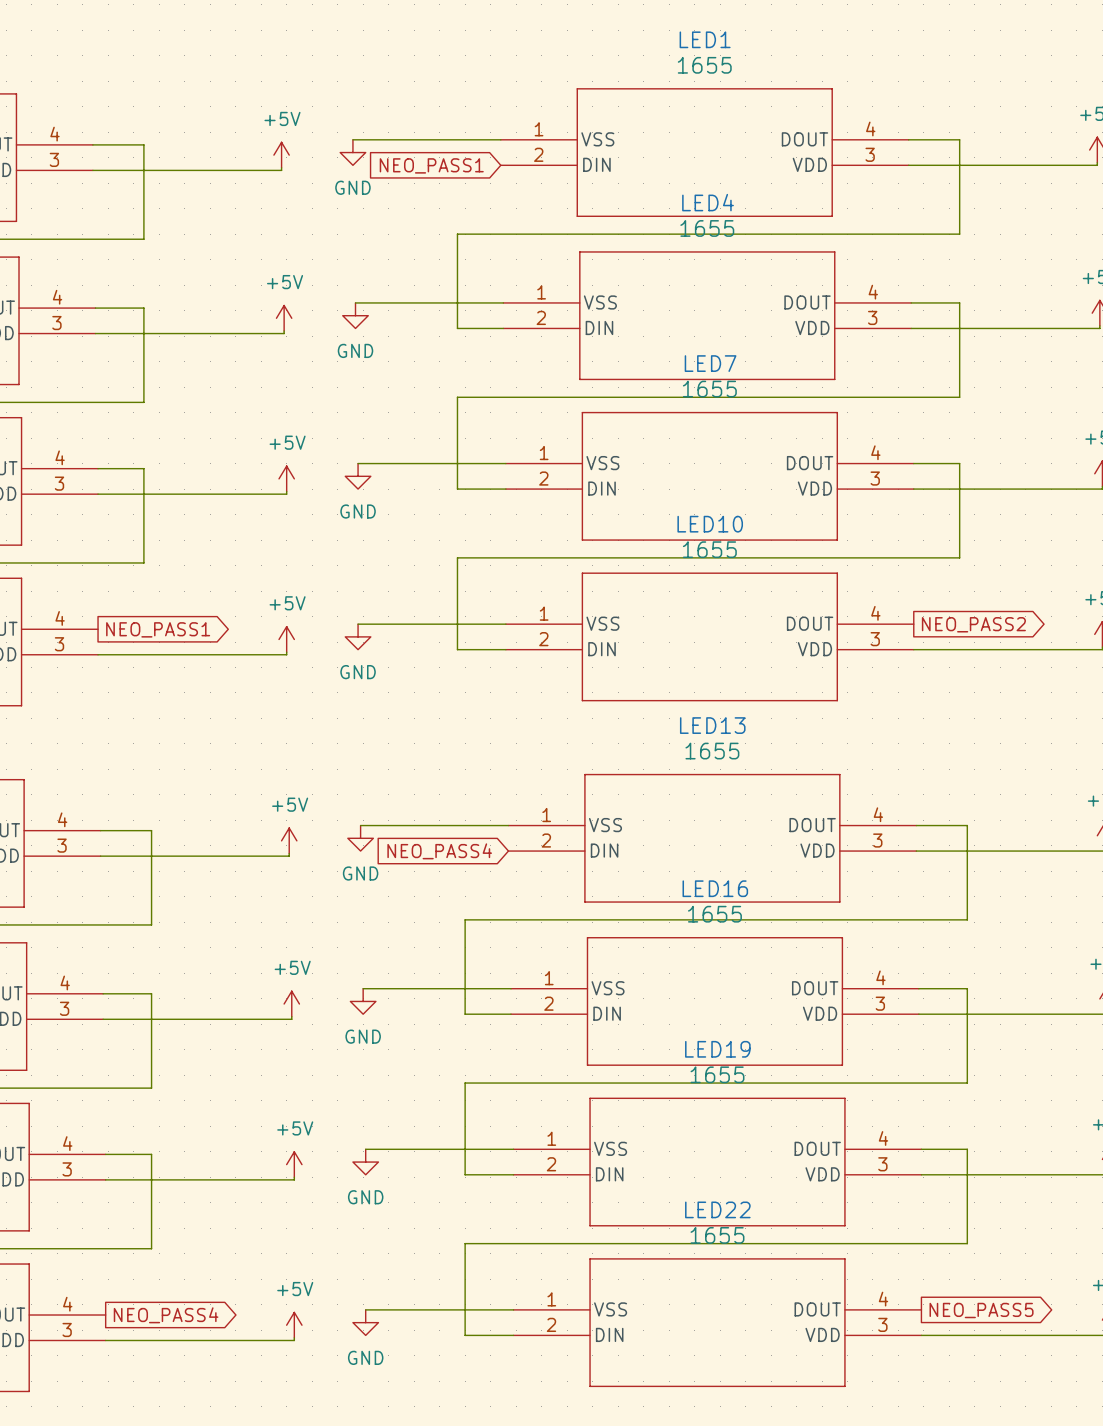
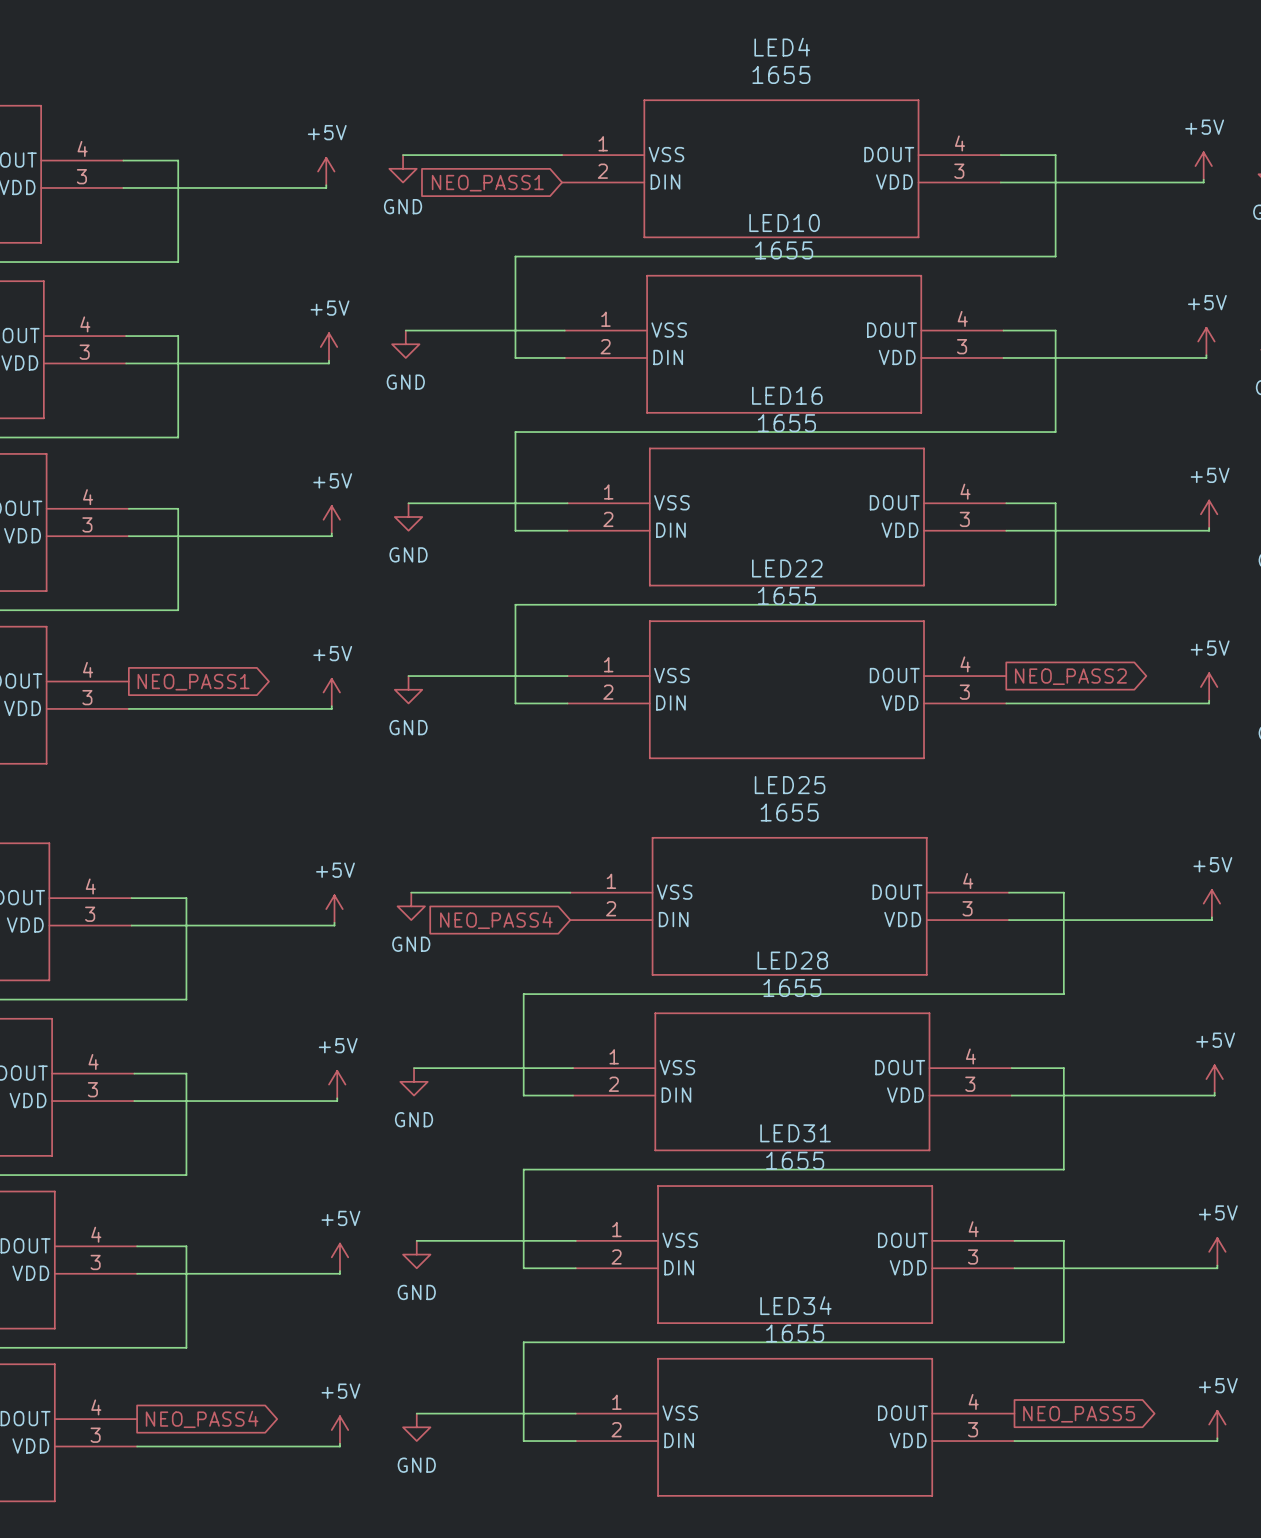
LED1 name: LED1 (705, 39) -> LED4 (782, 47)
LED4 name: LED4 (708, 202) -> LED10 (784, 223)
LED7 name: LED7 (710, 363) -> LED16 (787, 395)
LED10 name: LED10 (710, 524) -> LED22 (787, 568)
LED13 name: LED13 (712, 725) -> LED25 (790, 785)
LED16 name: LED16 (715, 888) -> LED28 (792, 960)
LED19 name: LED19 (717, 1049) -> LED31 (795, 1133)
LED22 name: LED22 (717, 1209) -> LED34 (795, 1305)

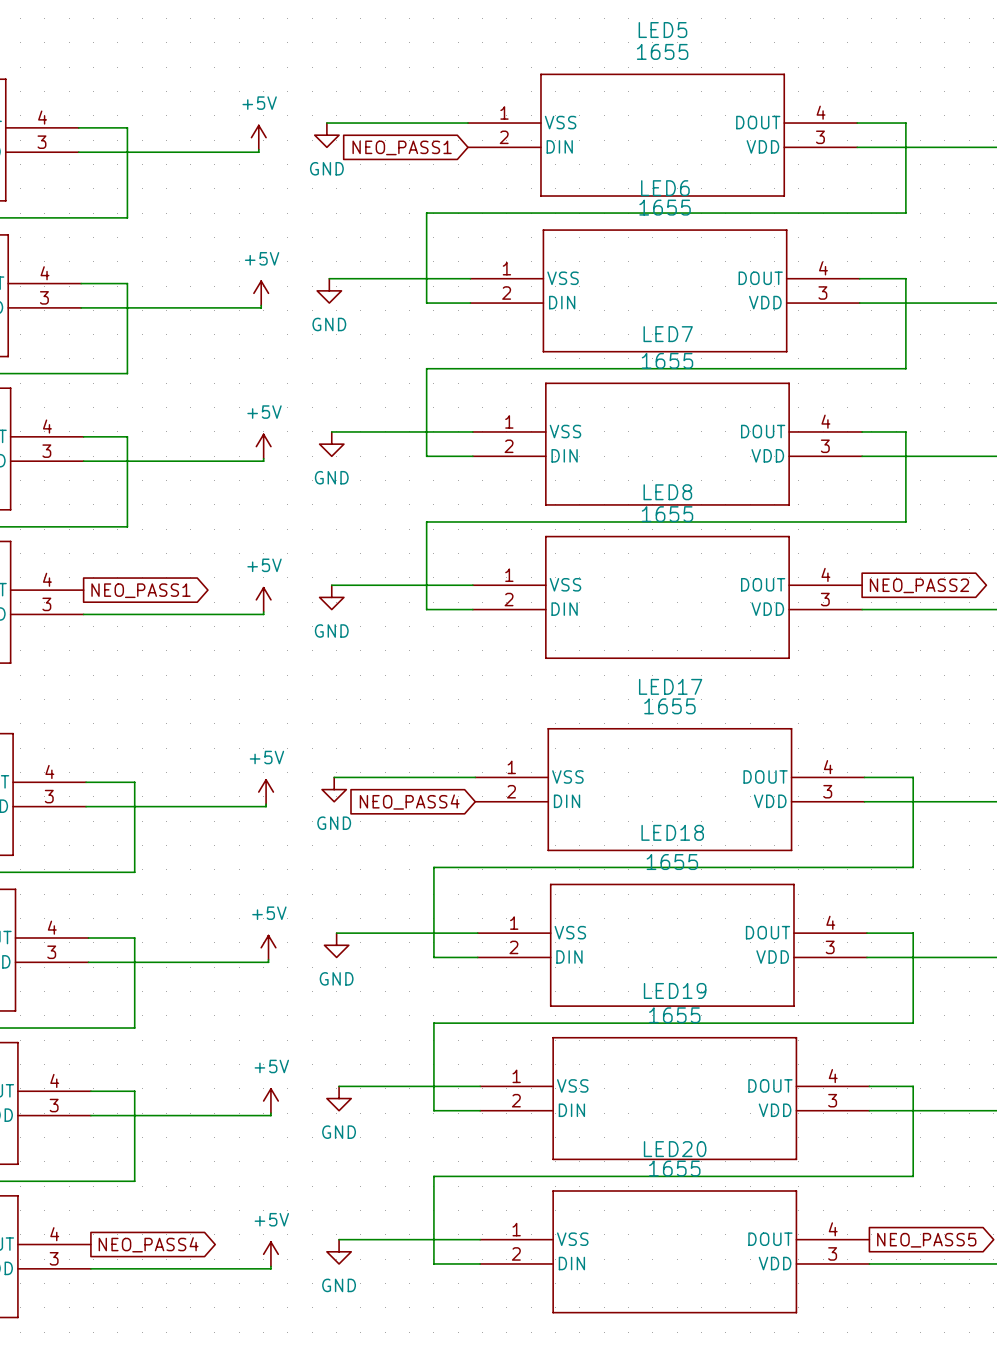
LED4 name: LED4 (782, 47) -> LED5 (662, 30)
LED10 name: LED10 (784, 223) -> LED6 (665, 188)
LED16 name: LED16 (787, 395) -> LED7 (668, 334)
LED22 name: LED22 (787, 568) -> LED8 (667, 492)
LED25 name: LED25 (790, 785) -> LED17 (670, 686)
LED28 name: LED28 (792, 960) -> LED18 (672, 832)
LED31 name: LED31 (795, 1133) -> LED19 (675, 990)
LED34 name: LED34 (795, 1305) -> LED20 (675, 1149)

